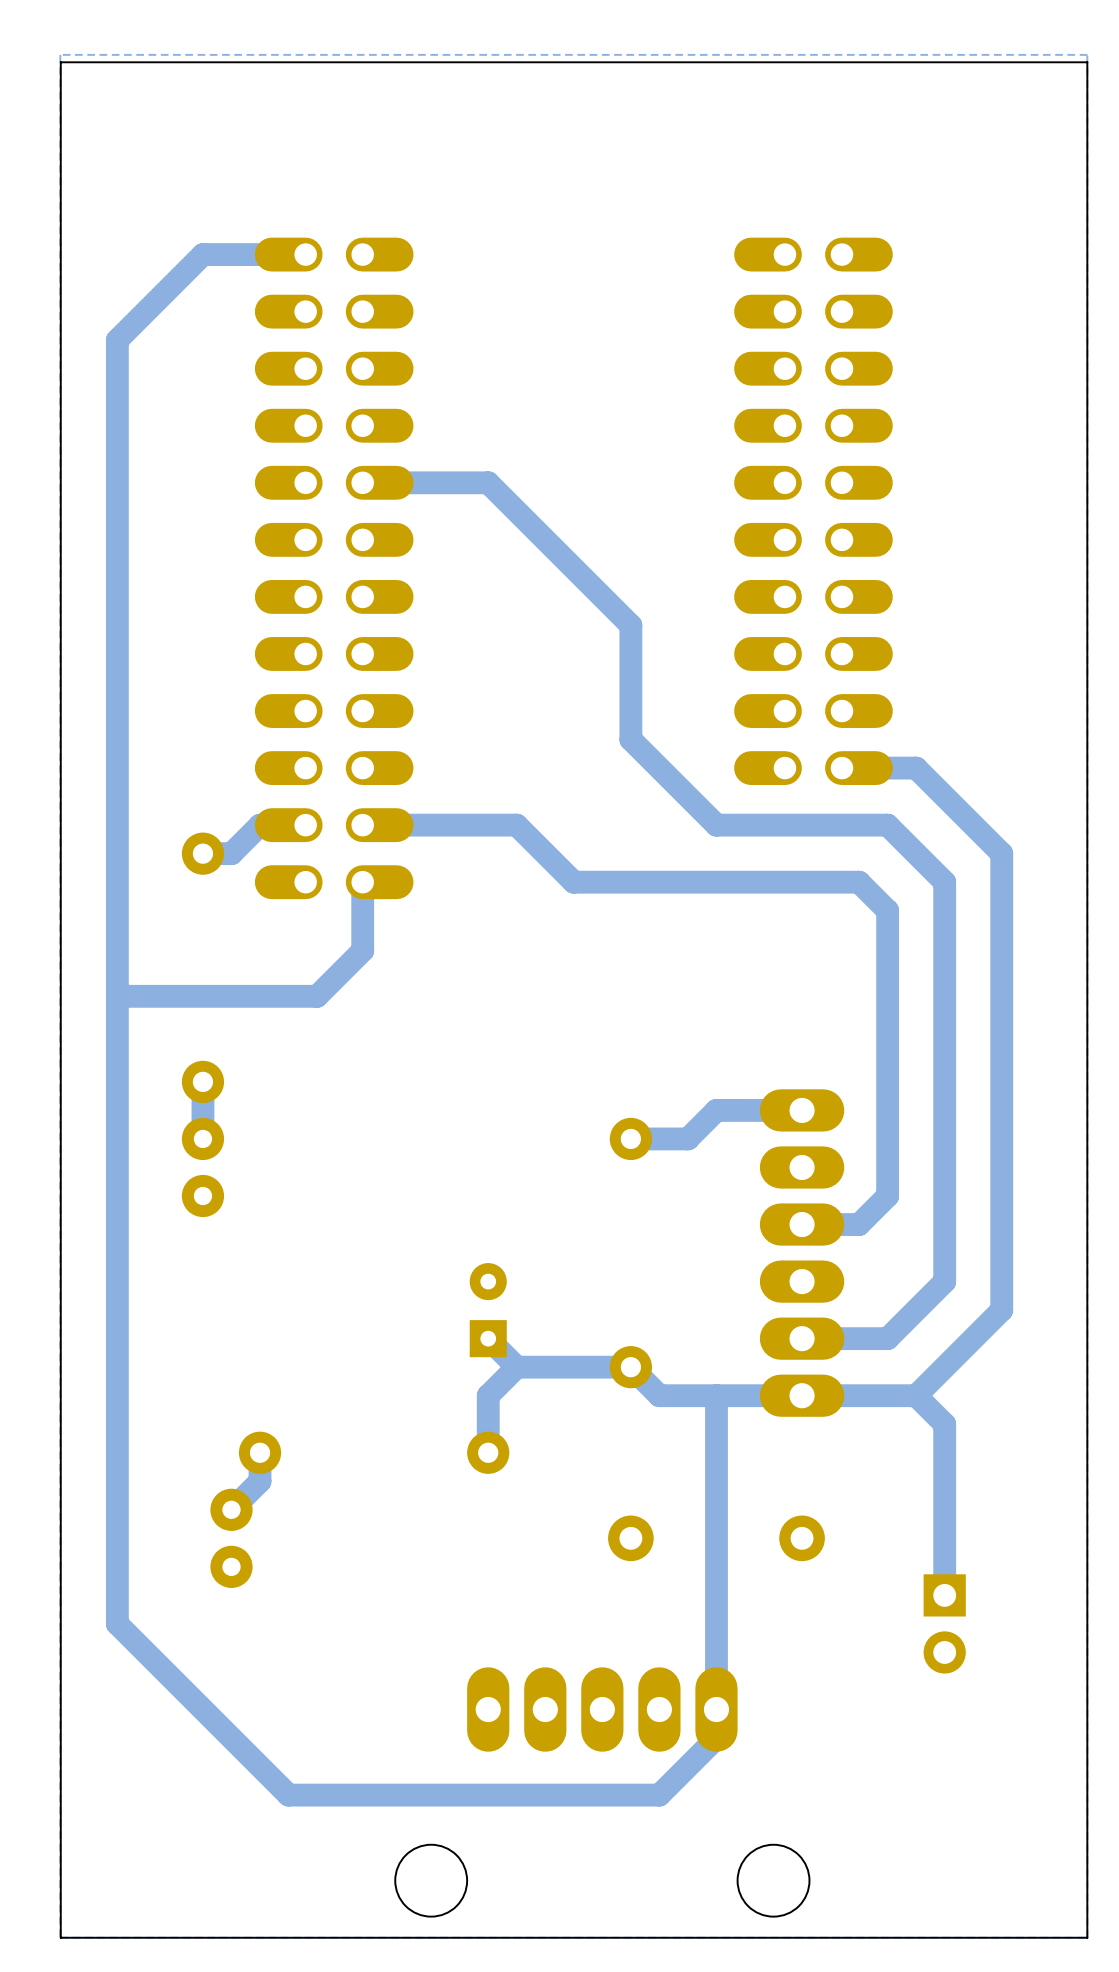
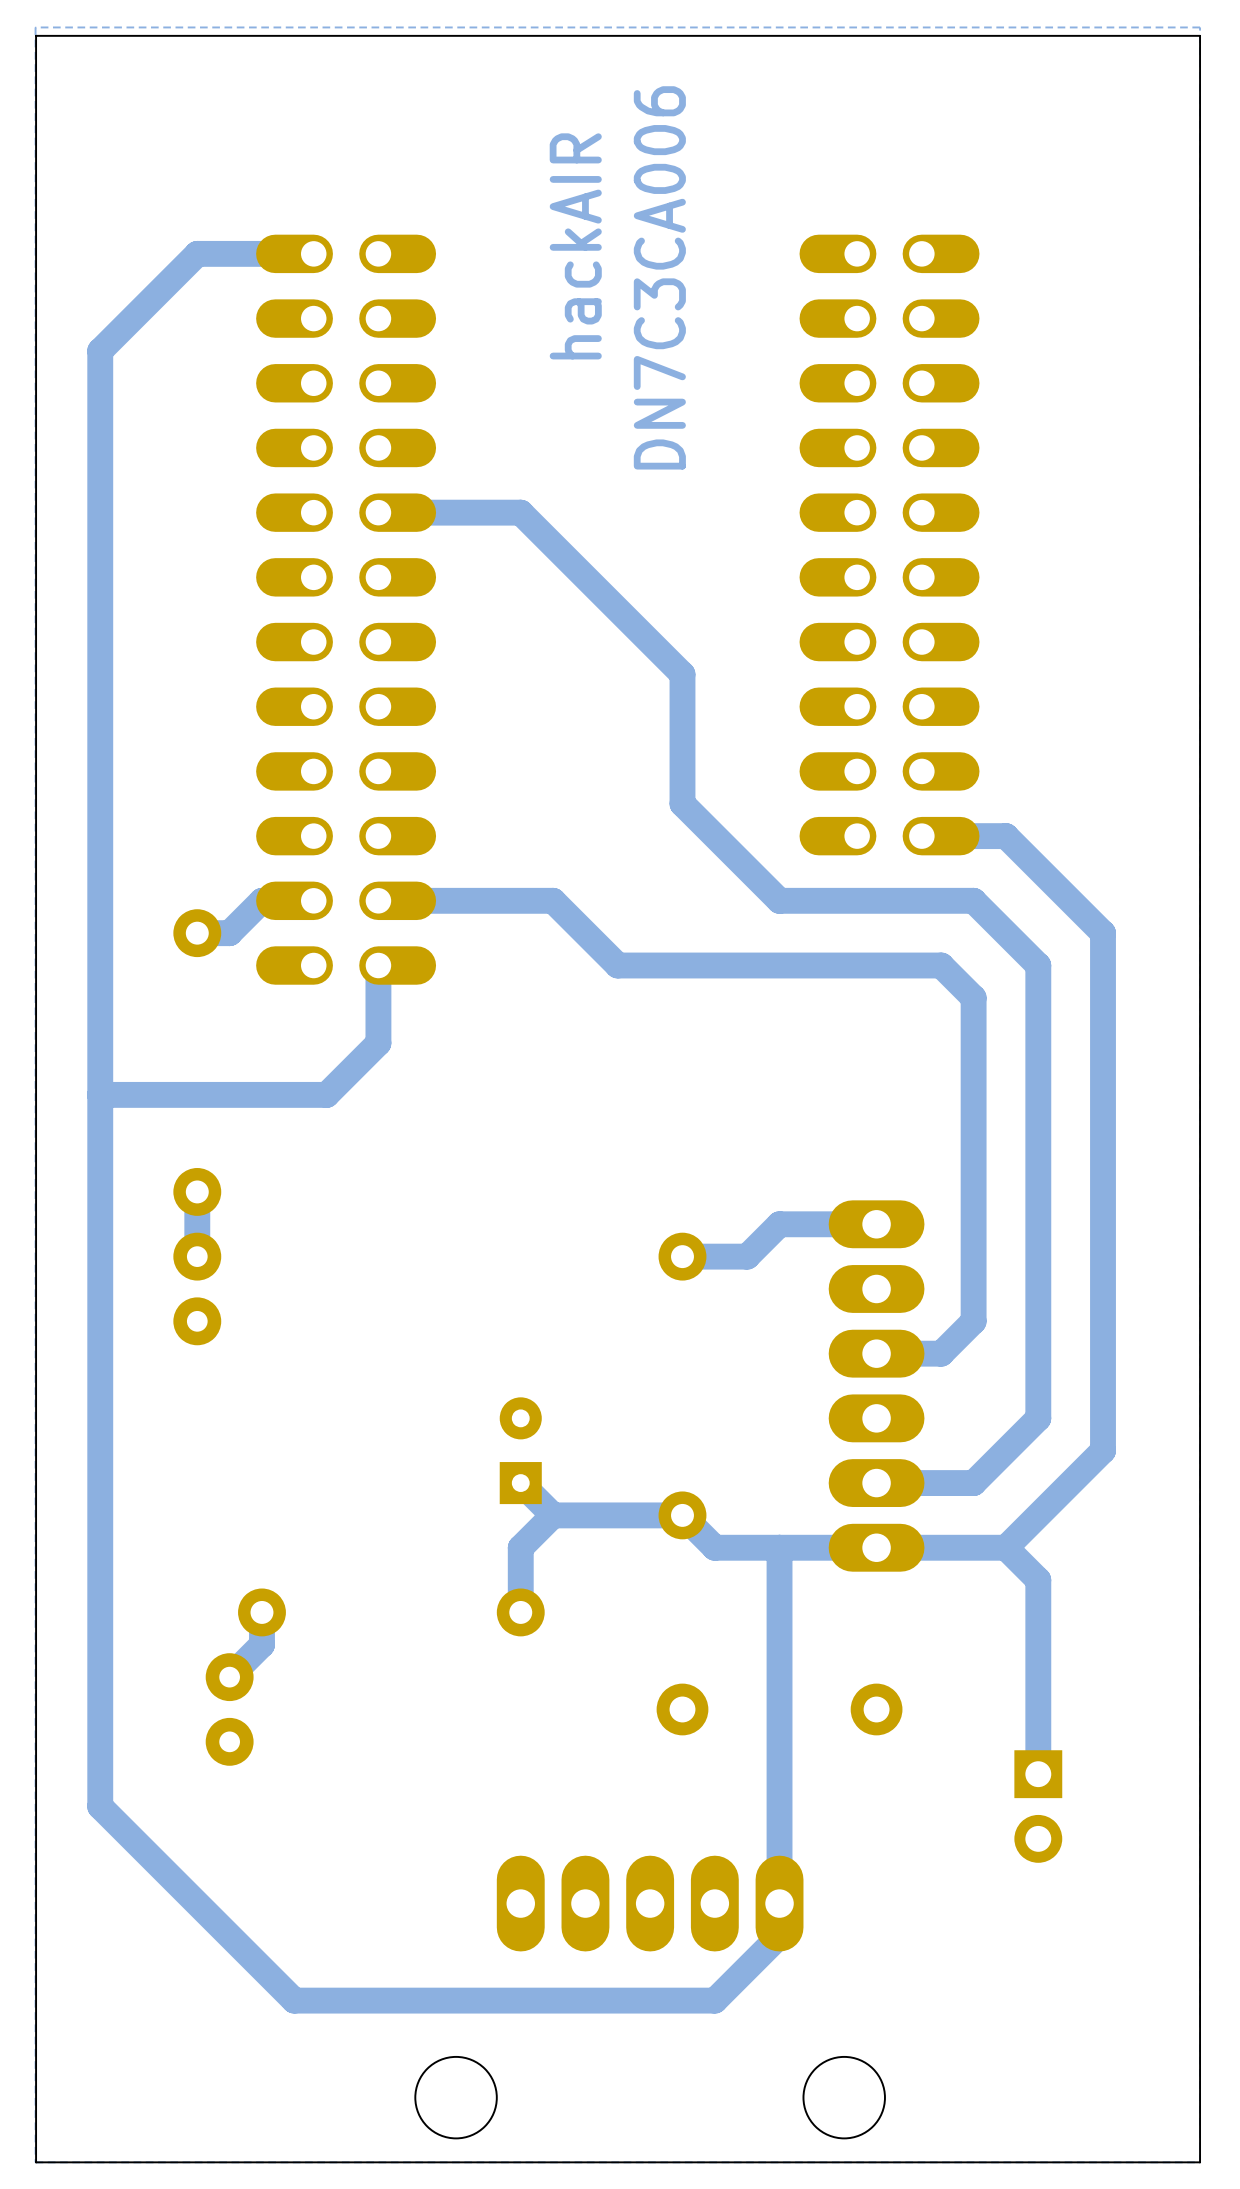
text: none -> hackAIR (575, 246)
text: none -> DN7C3CA006 (659, 277)

